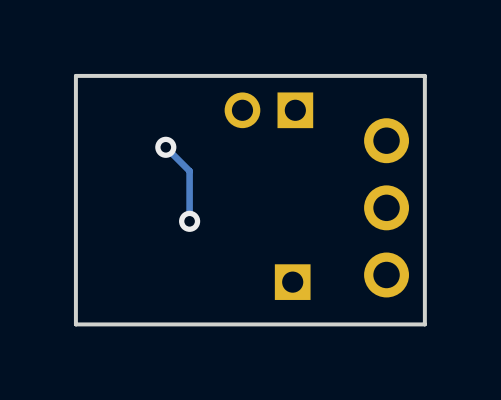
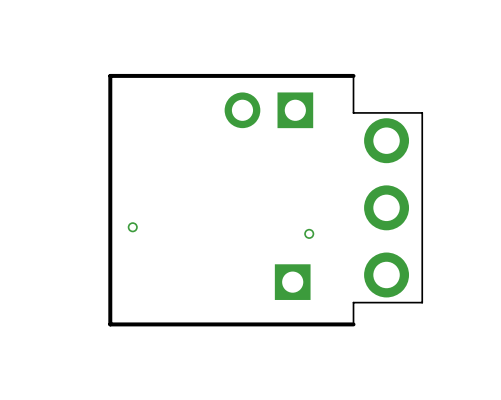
board edge: (110, 75) (75, 75) (75, 324) (110, 324) -> (110, 75) (110, 324)
board edge: (353, 75) (424, 75) (424, 324) (353, 324) -> (353, 75) (353, 112) (422, 112) (422, 302) (353, 302) (353, 324)
track: (165, 147) (189, 171) (189, 221) -> none
via: (165, 147) -> none
via: (189, 221) -> none
via: none -> (132, 227)
via: none -> (309, 233)

